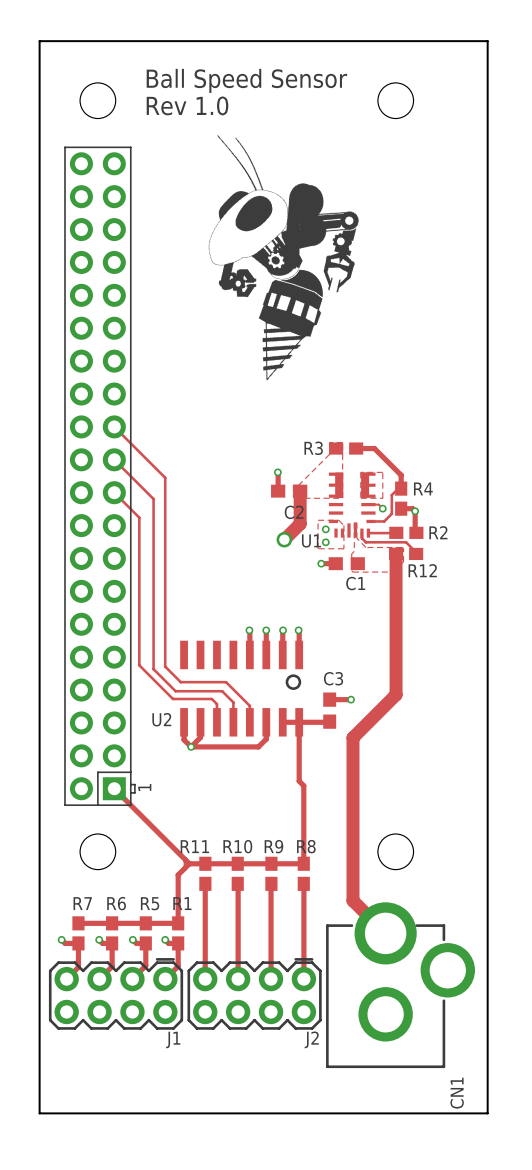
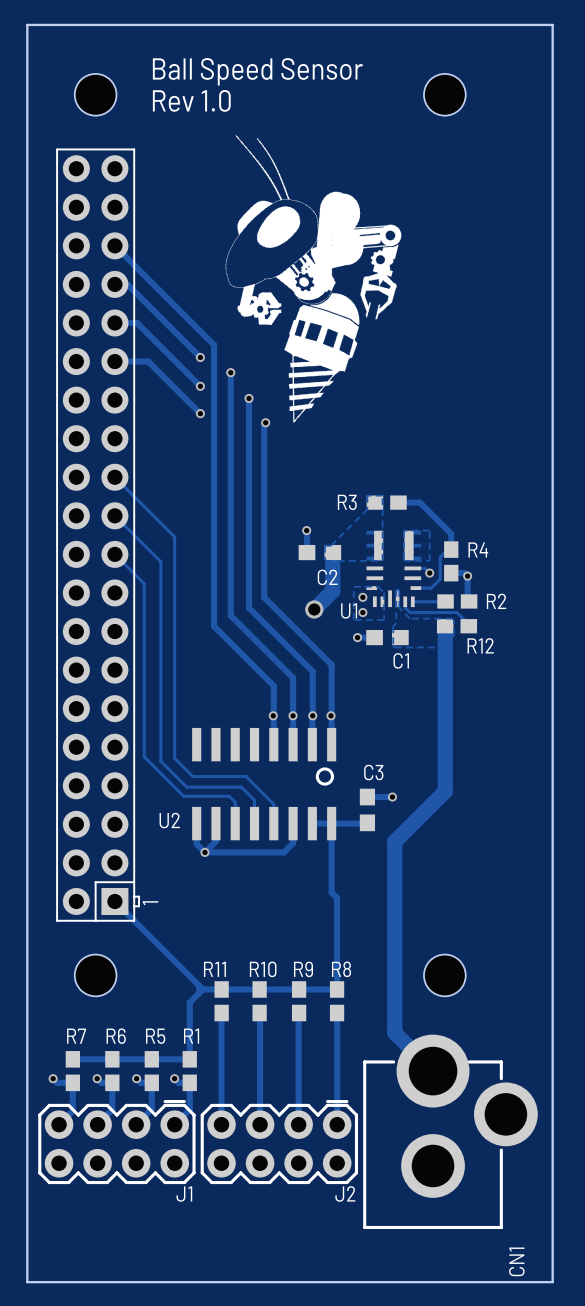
track: none -> (114, 245) (214, 345) (214, 626) (273, 685) (273, 715)
track: none -> (114, 284) (127, 284) (200, 357)
track: none -> (114, 322) (137, 322) (200, 386)
via: none -> (200, 357)
track: none -> (114, 361) (148, 361) (200, 413)
track: none -> (230, 372) (230, 615) (293, 677) (293, 715)
via: none -> (230, 372)
via: none -> (200, 386)
track: none -> (248, 398) (248, 607) (312, 671) (312, 715)
via: none -> (248, 398)
via: none -> (200, 413)
track: none -> (265, 422) (264, 424) (264, 597) (331, 664) (331, 715)
via: none -> (265, 422)

